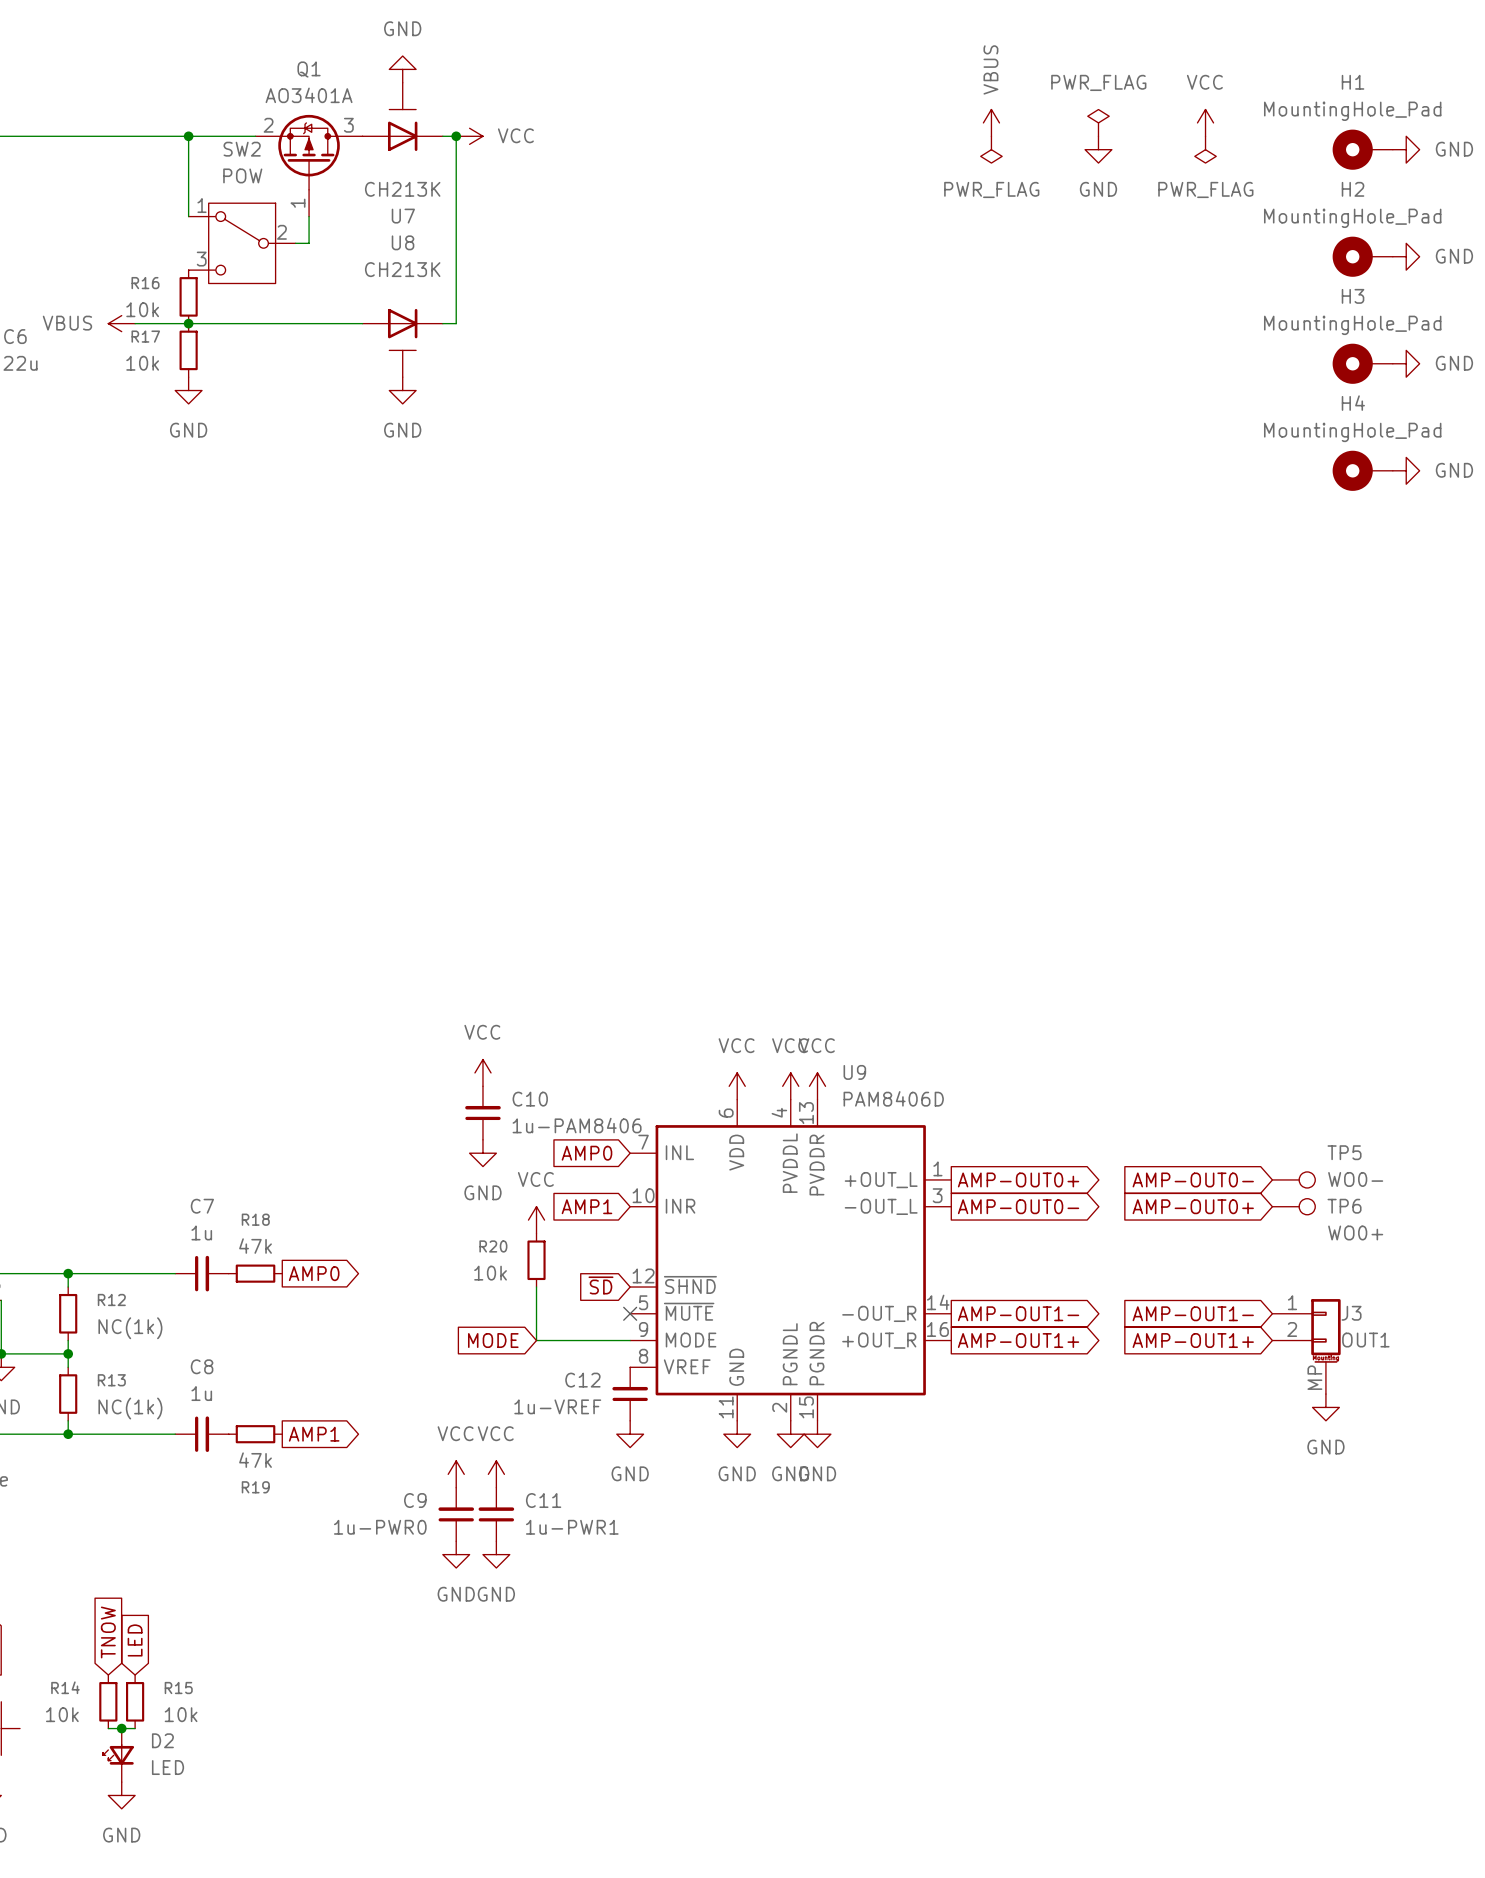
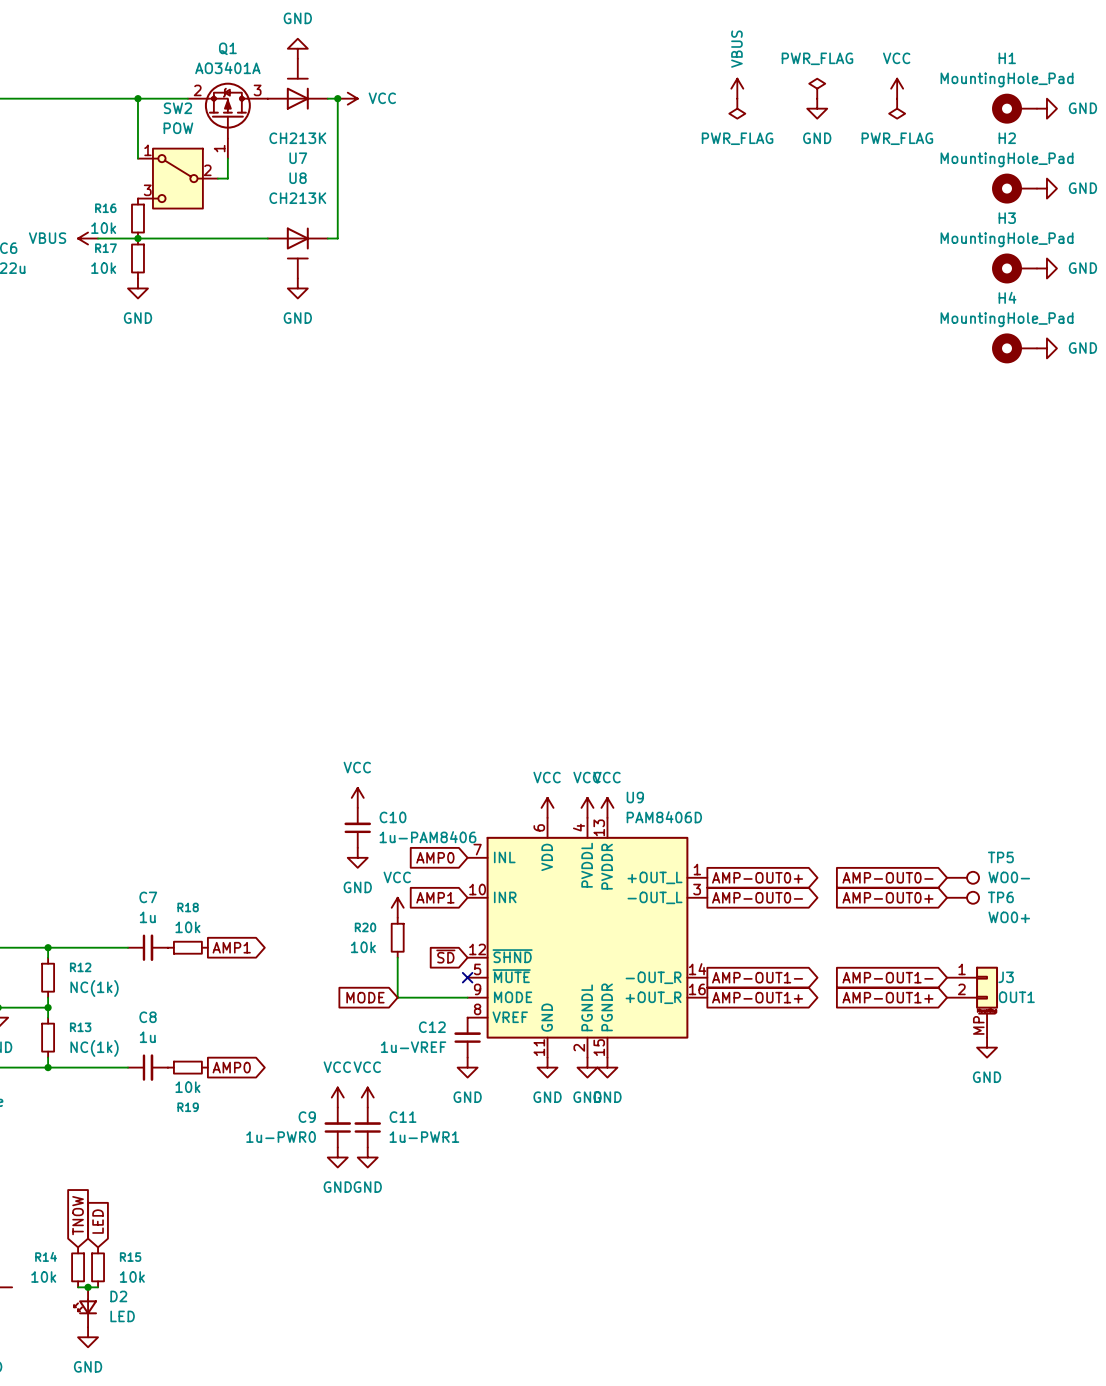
R18 value: 47k (255, 1246) -> 10k (187, 927)
global label: AMP0 (314, 1273) -> AMP1 (231, 947)
global label: AMP1 (314, 1434) -> AMP0 (231, 1067)
R19 value: 47k (255, 1460) -> 10k (187, 1087)

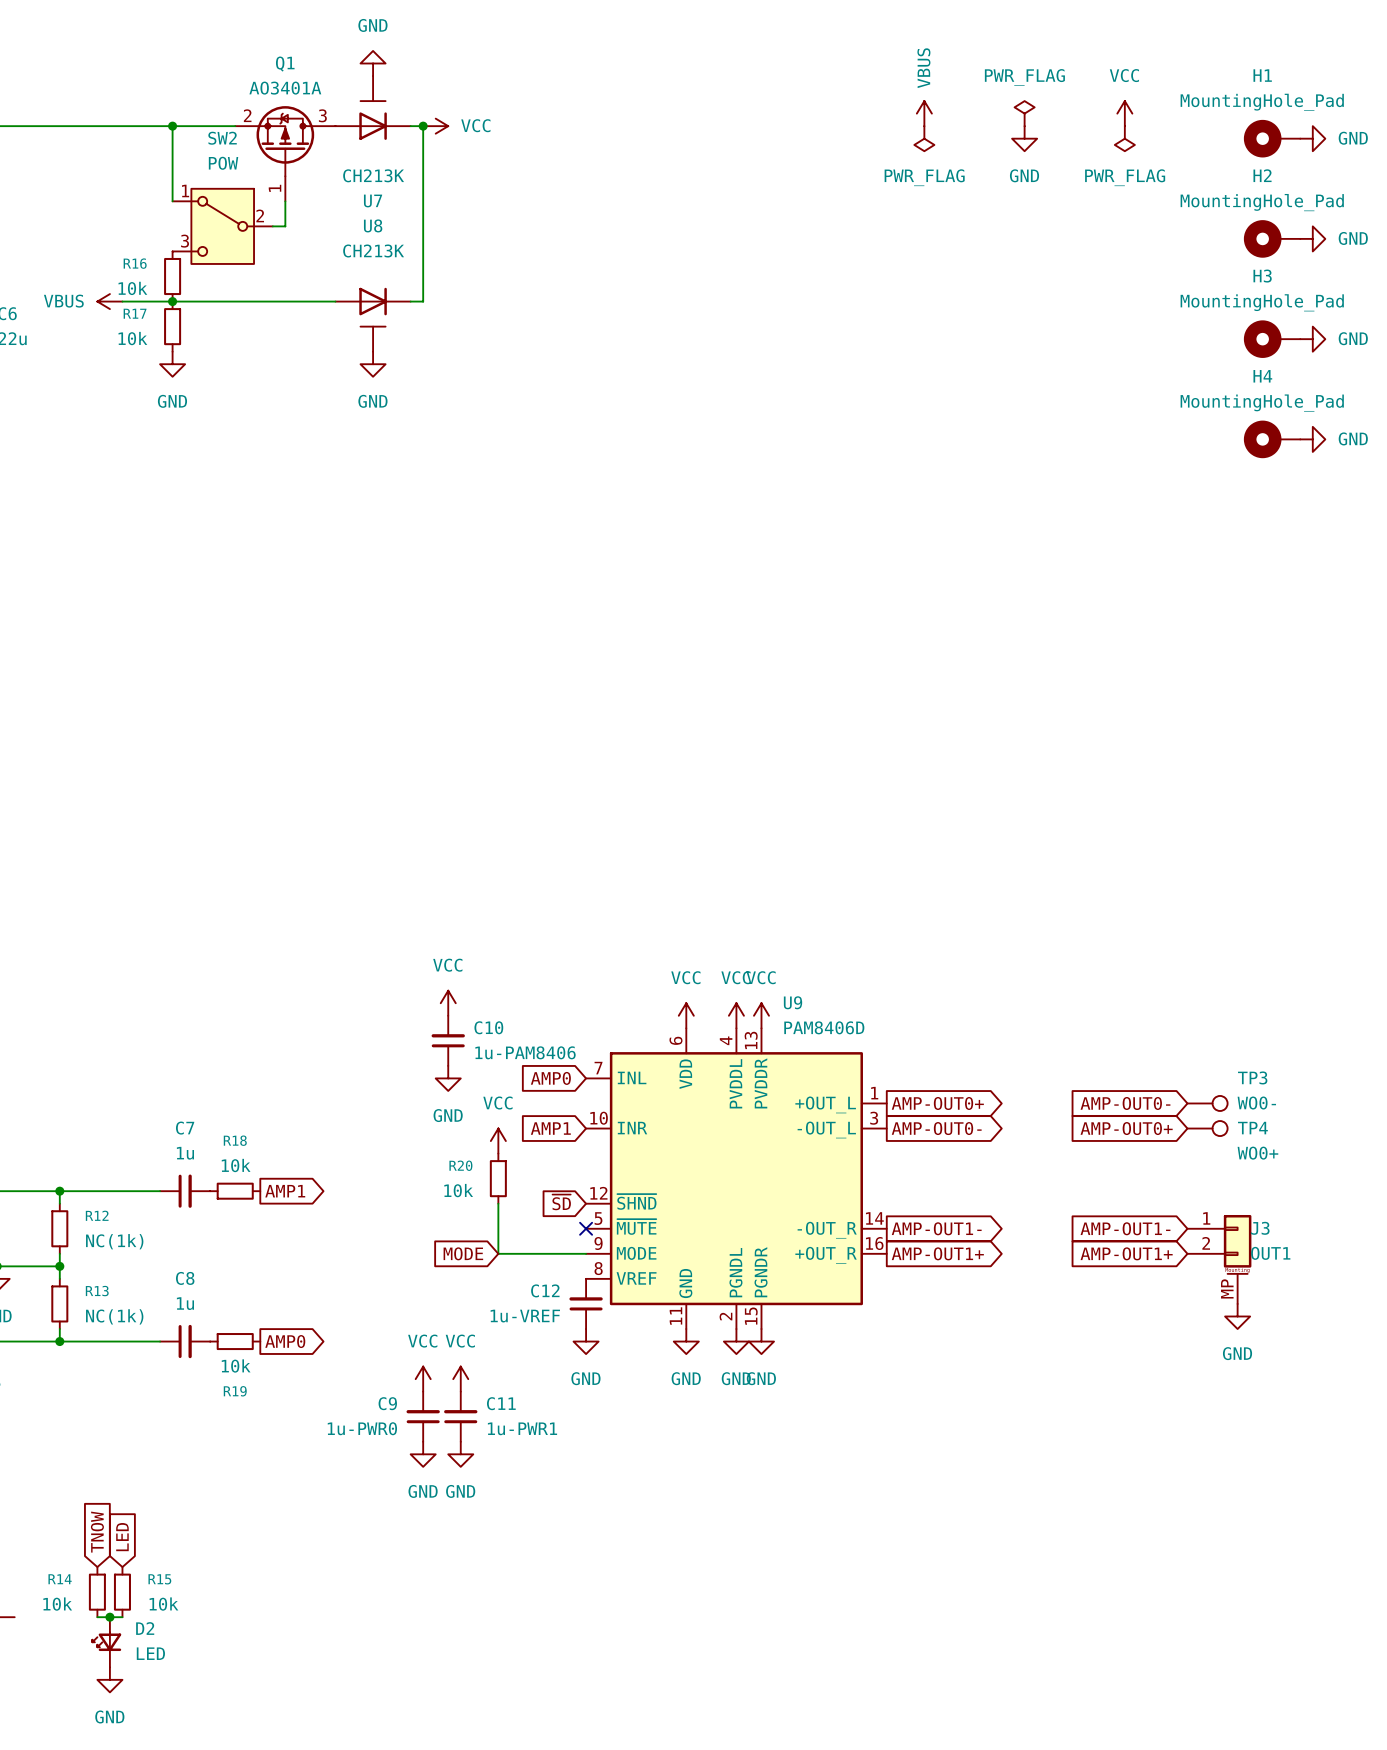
TP5 name: TP5 (1000, 857) -> TP3 (1252, 1077)
TP6 name: TP6 (1000, 897) -> TP4 (1252, 1128)

